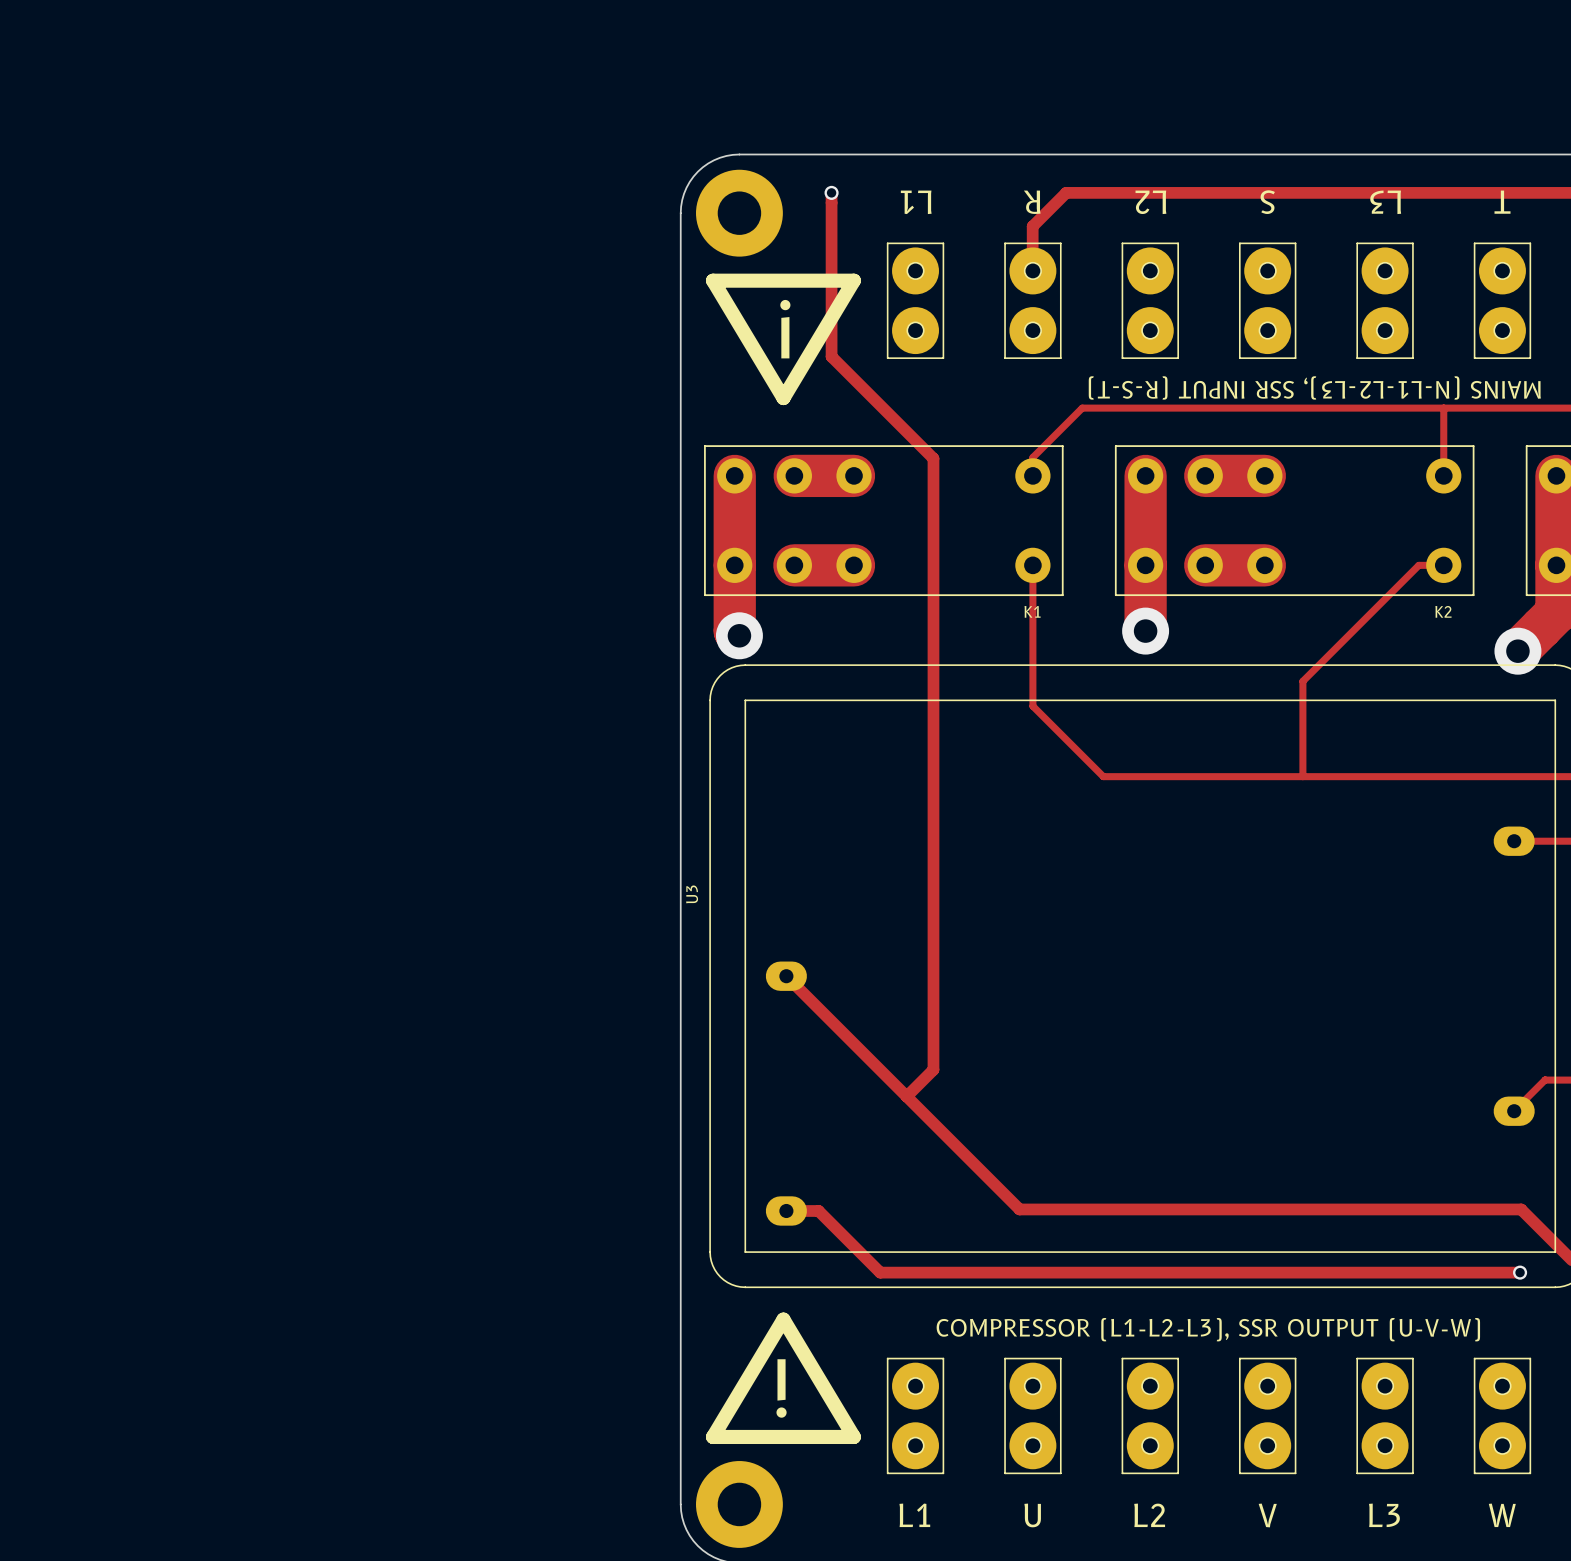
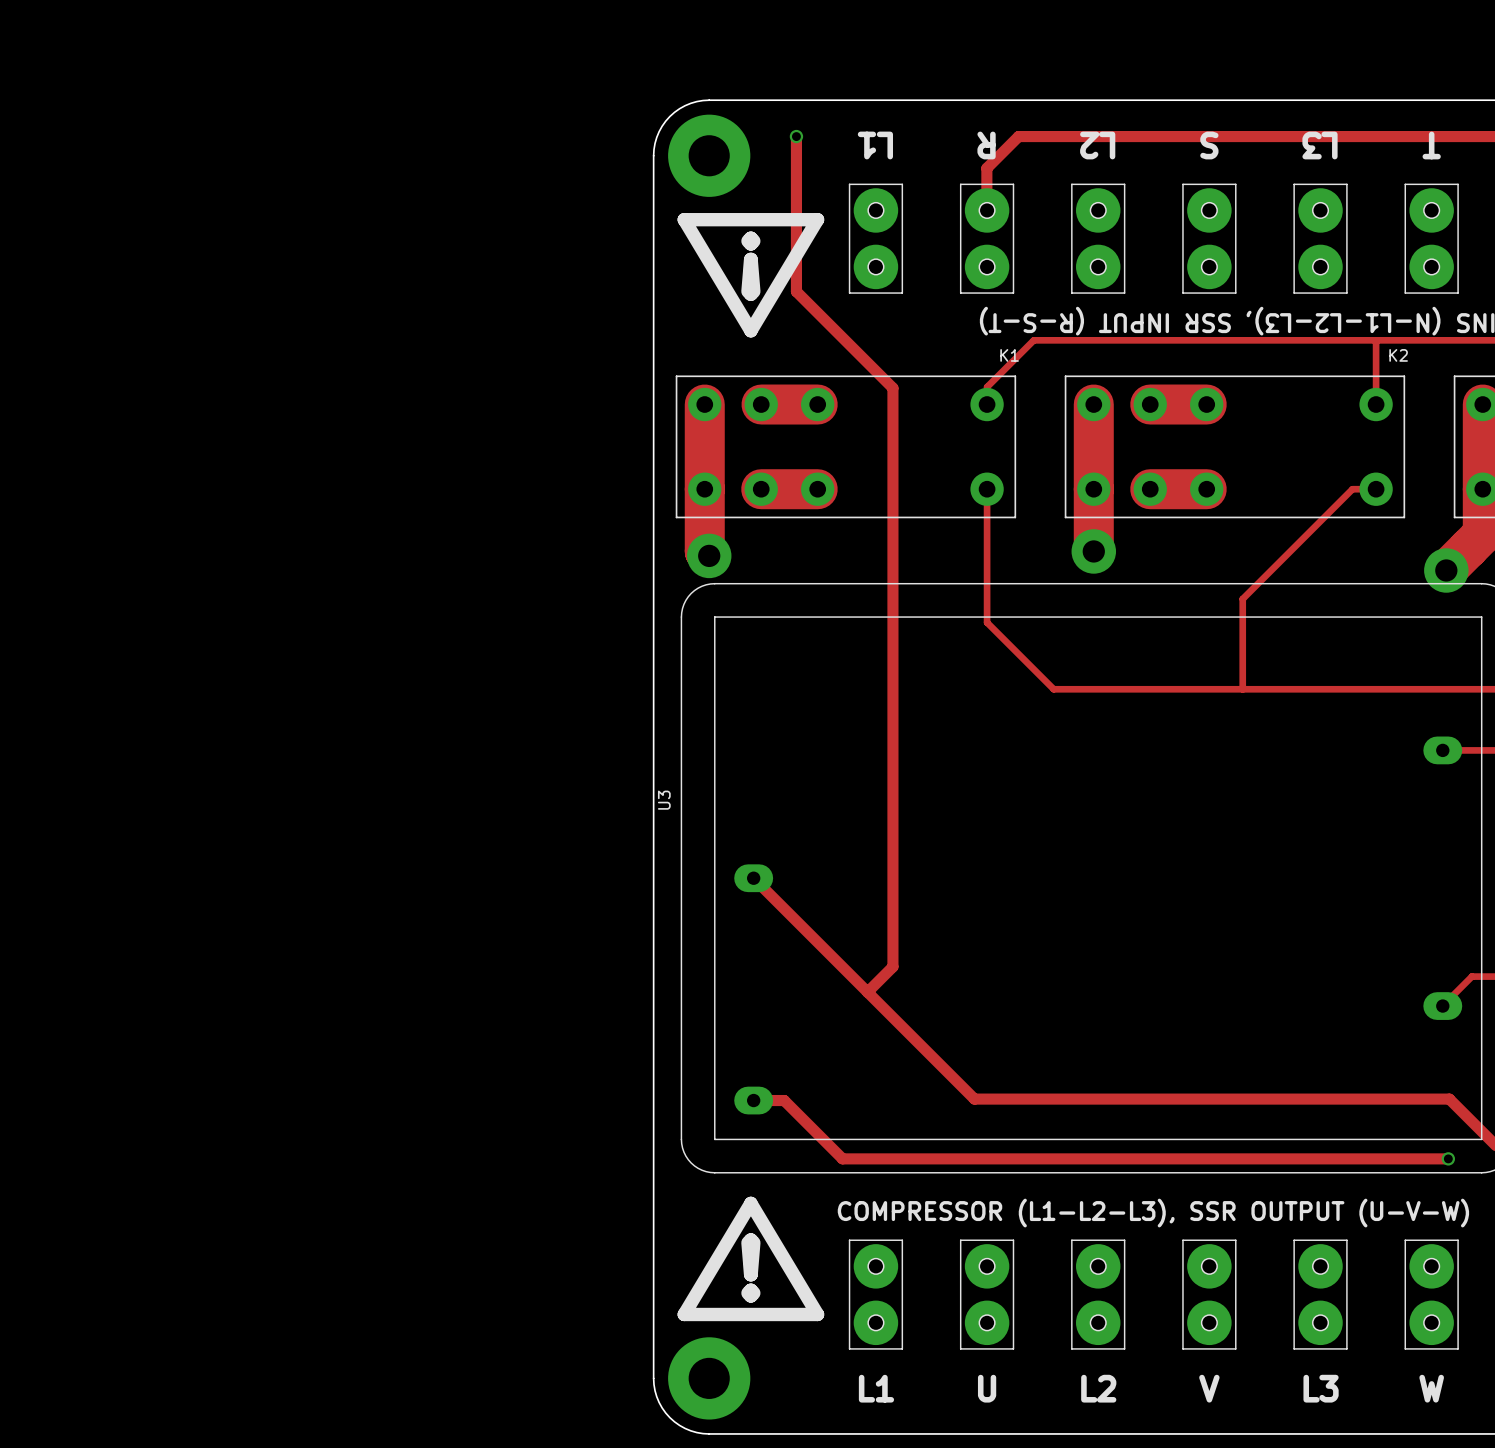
K1 name position: K1 (1032, 611) -> K1 (1009, 355)
K2 name position: K2 (1443, 611) -> K2 (1398, 355)

